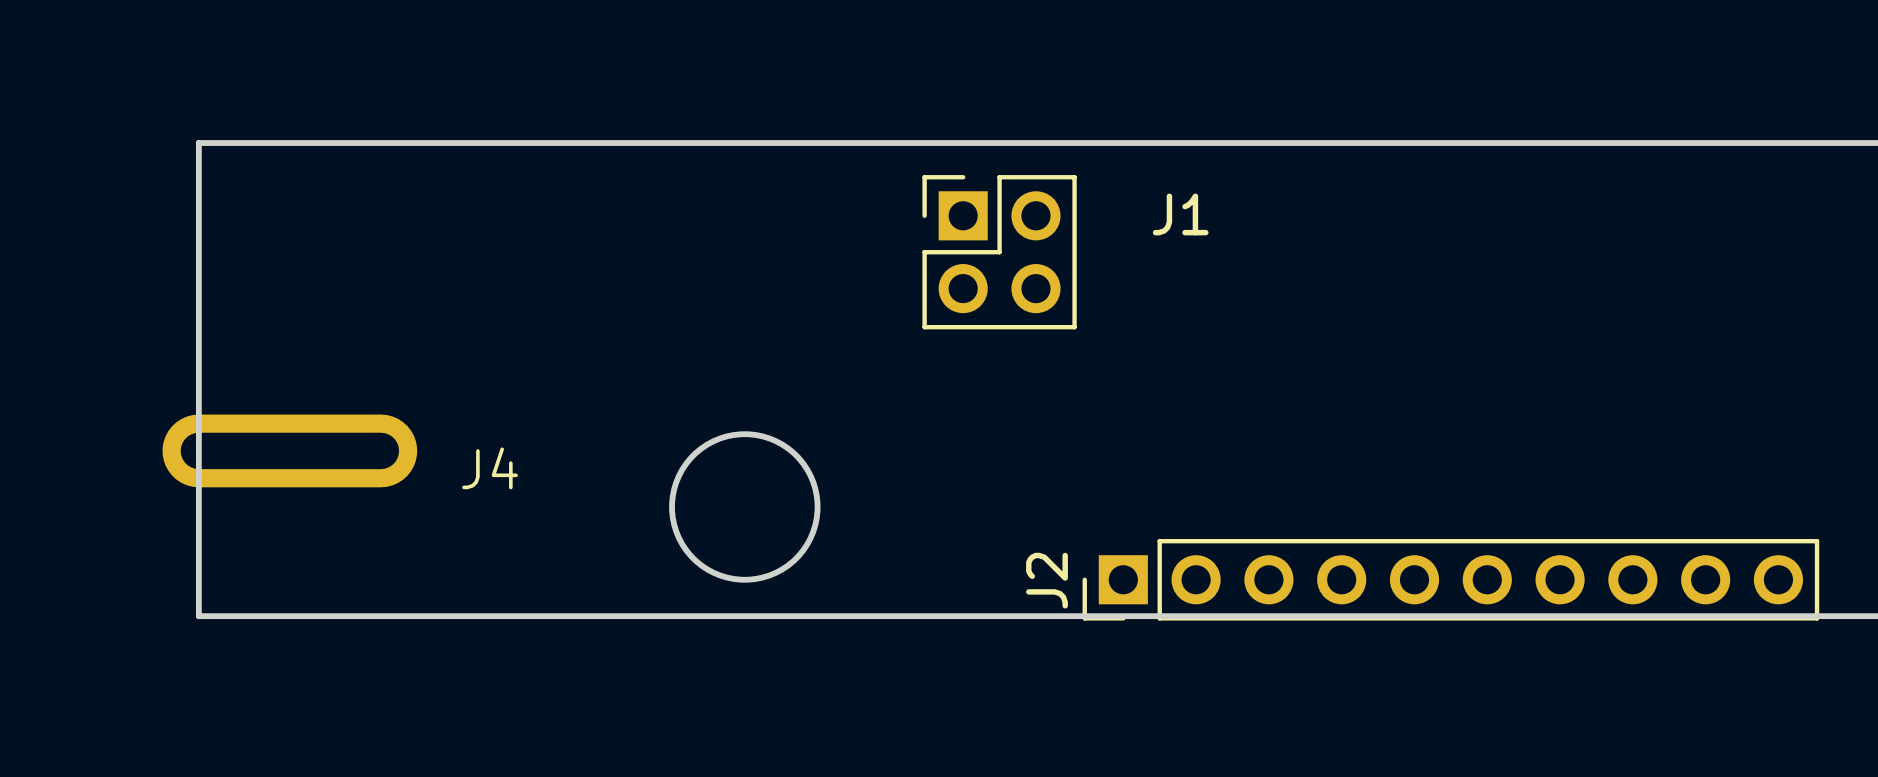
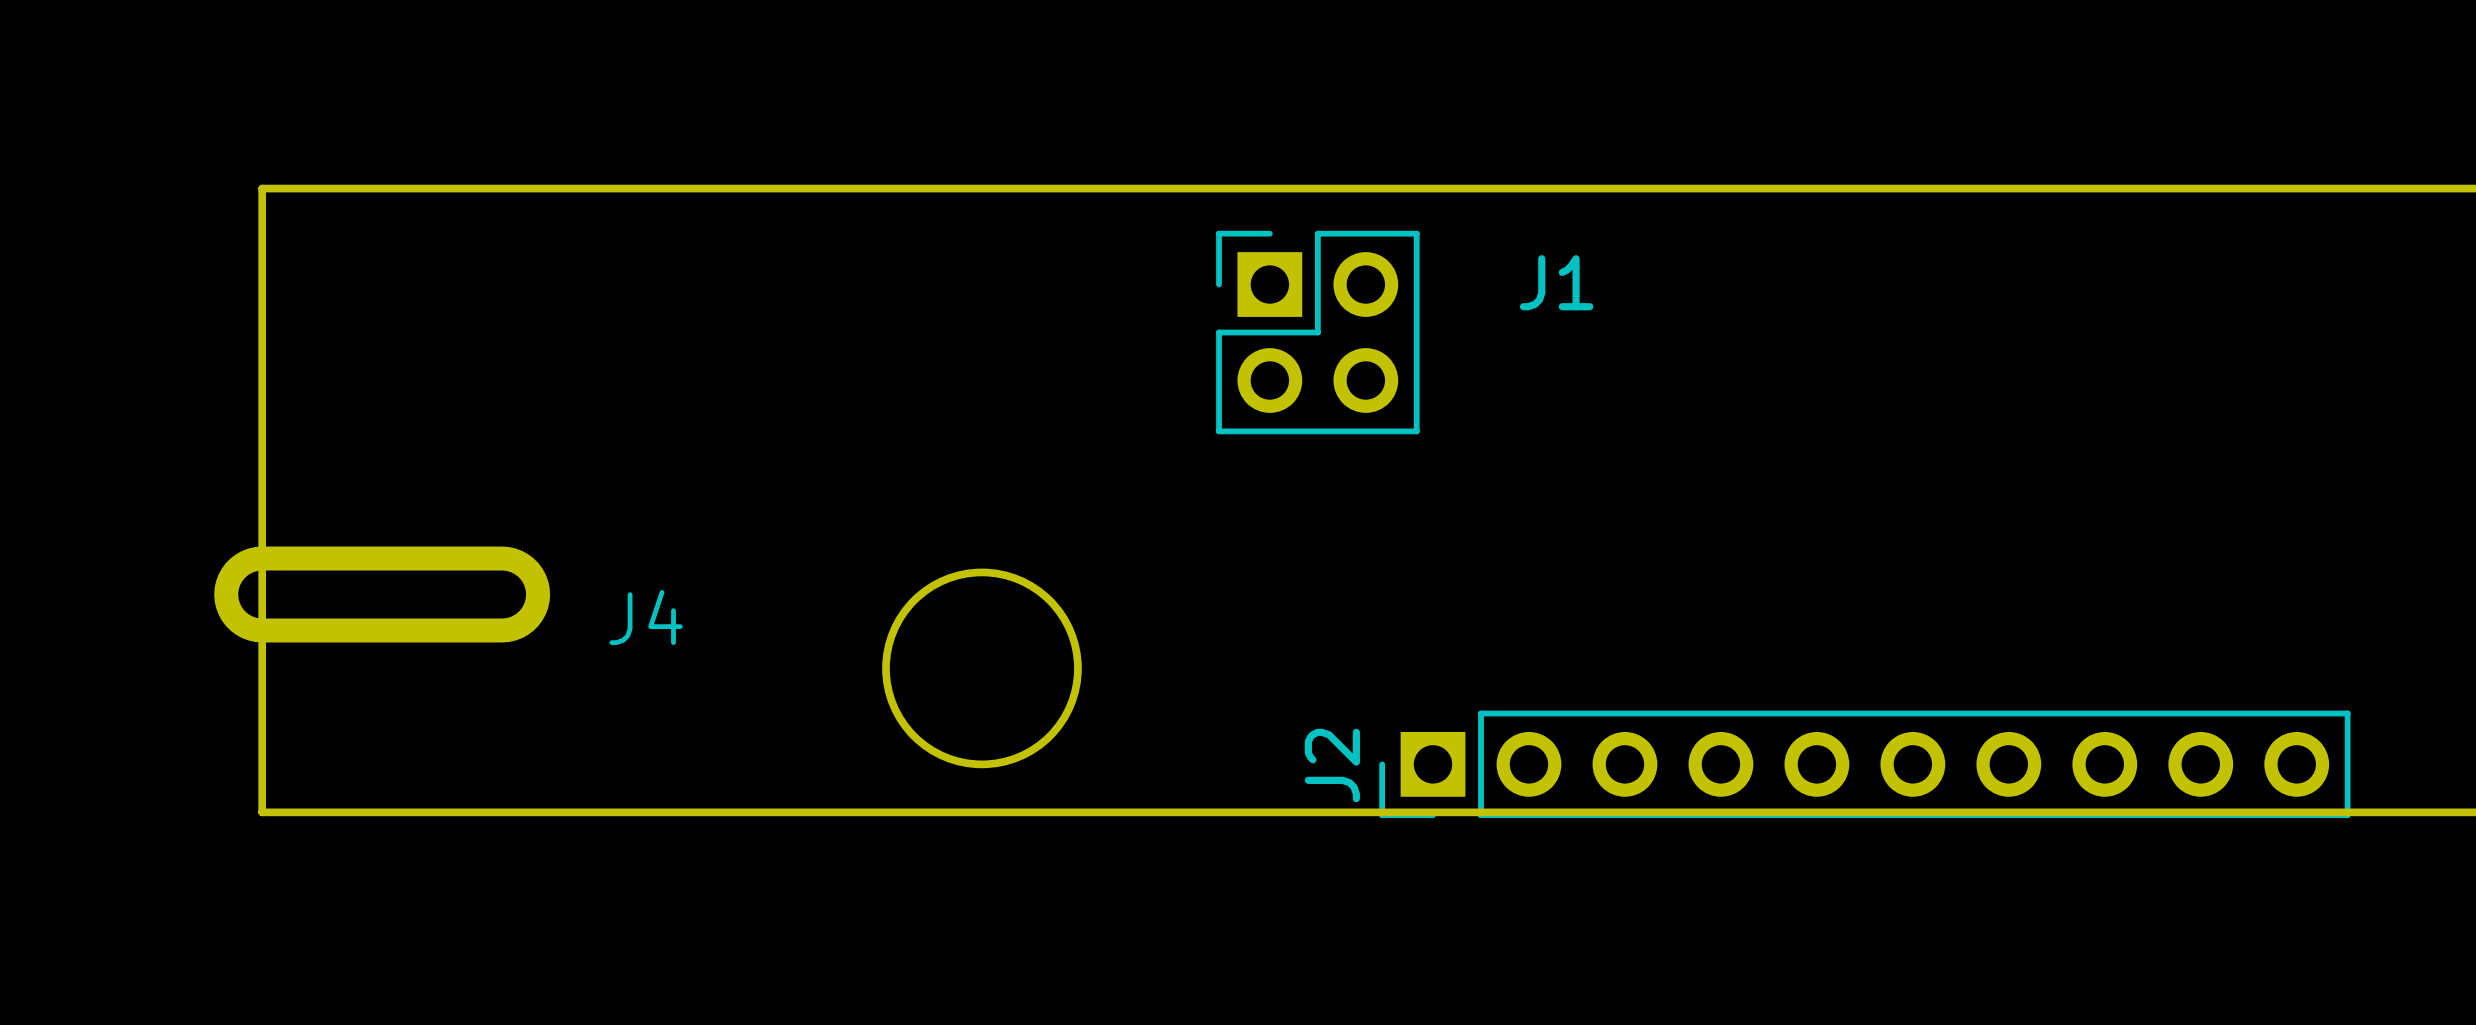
J2 position: (1450, 579) -> (1864, 764)

